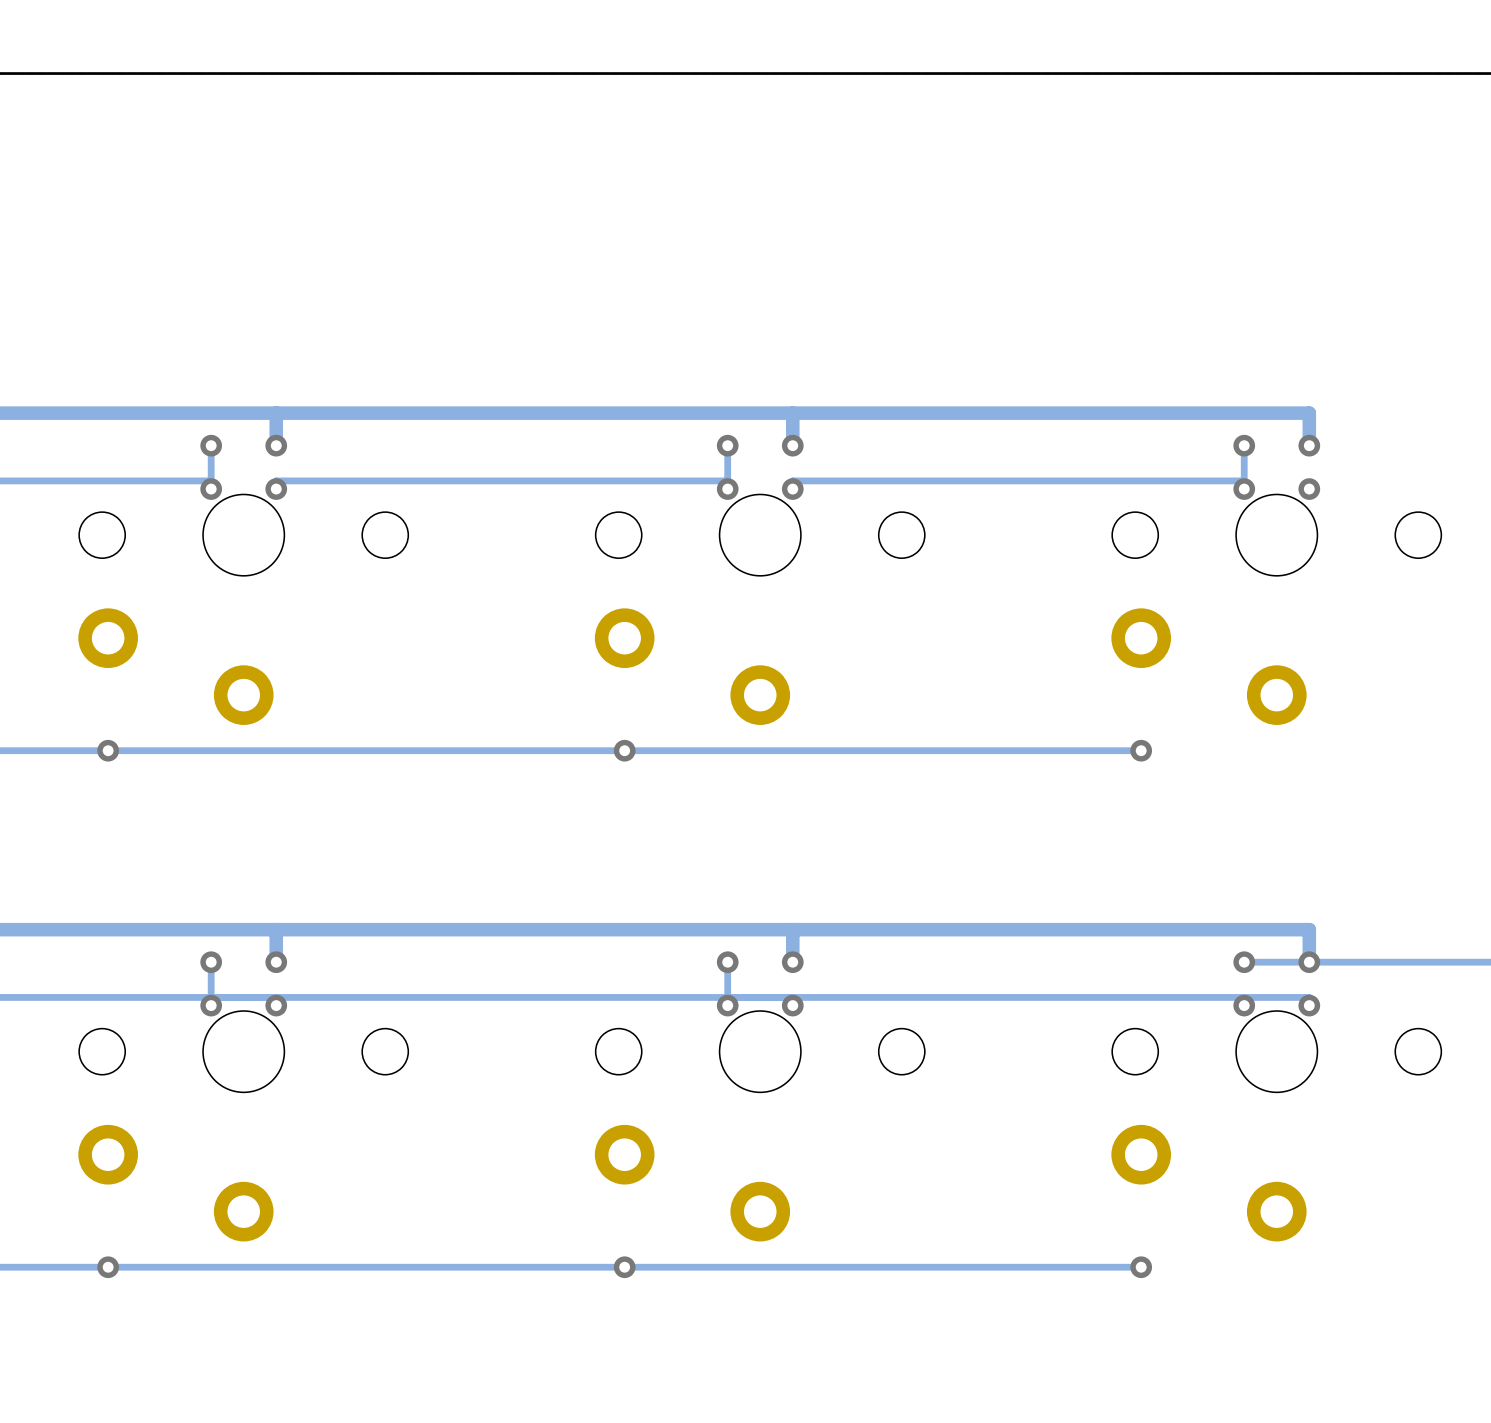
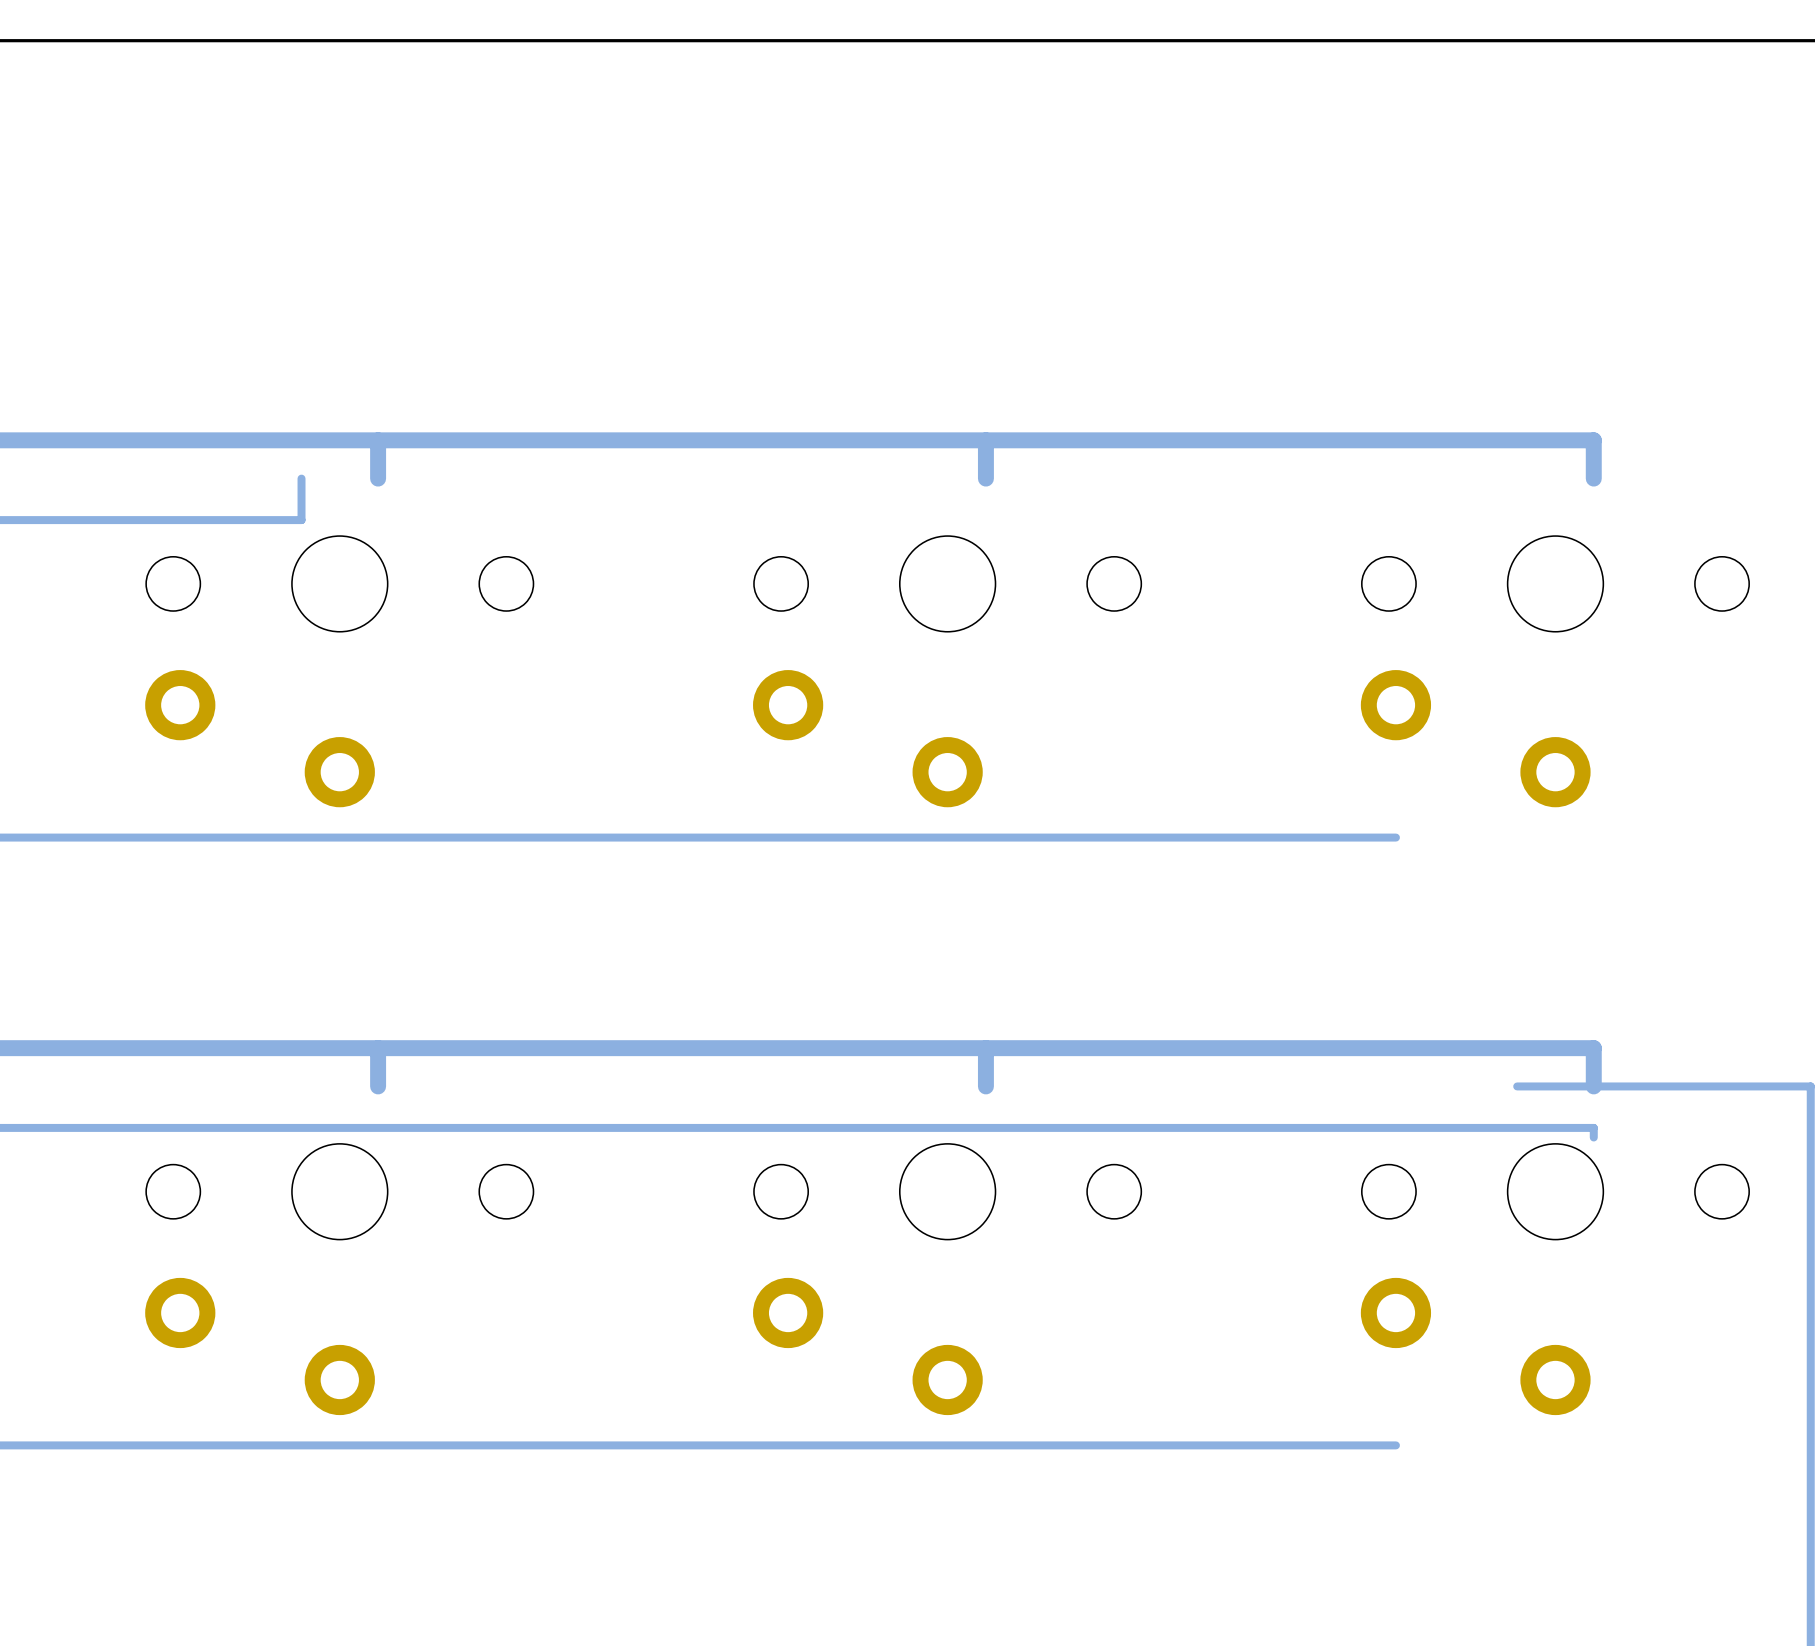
via: (211, 445) -> none
via: (276, 445) -> none
track: (727, 445) (727, 480) (276, 480) (276, 489) -> none
via: (727, 445) -> none
via: (792, 445) -> none
track: (1244, 445) (1244, 480) (792, 480) (792, 489) -> none
via: (1244, 445) -> none
via: (1309, 445) -> none
via: (211, 489) -> none
via: (276, 489) -> none
via: (727, 489) -> none
via: (792, 489) -> none
via: (1244, 489) -> none
via: (1309, 489) -> none
via: (108, 750) -> none
via: (624, 750) -> none
via: (1141, 750) -> none
track: (211, 962) (211, 997) -> none
via: (211, 962) -> none
via: (276, 962) -> none
track: (727, 962) (727, 997) -> none
via: (727, 962) -> none
via: (792, 962) -> none
via: (1244, 962) -> none
via: (1309, 962) -> none
via: (211, 1005) -> none
via: (276, 1005) -> none
via: (727, 1005) -> none
via: (792, 1005) -> none
via: (1244, 1005) -> none
via: (1309, 1005) -> none
via: (108, 1267) -> none
via: (624, 1267) -> none
via: (1141, 1267) -> none

